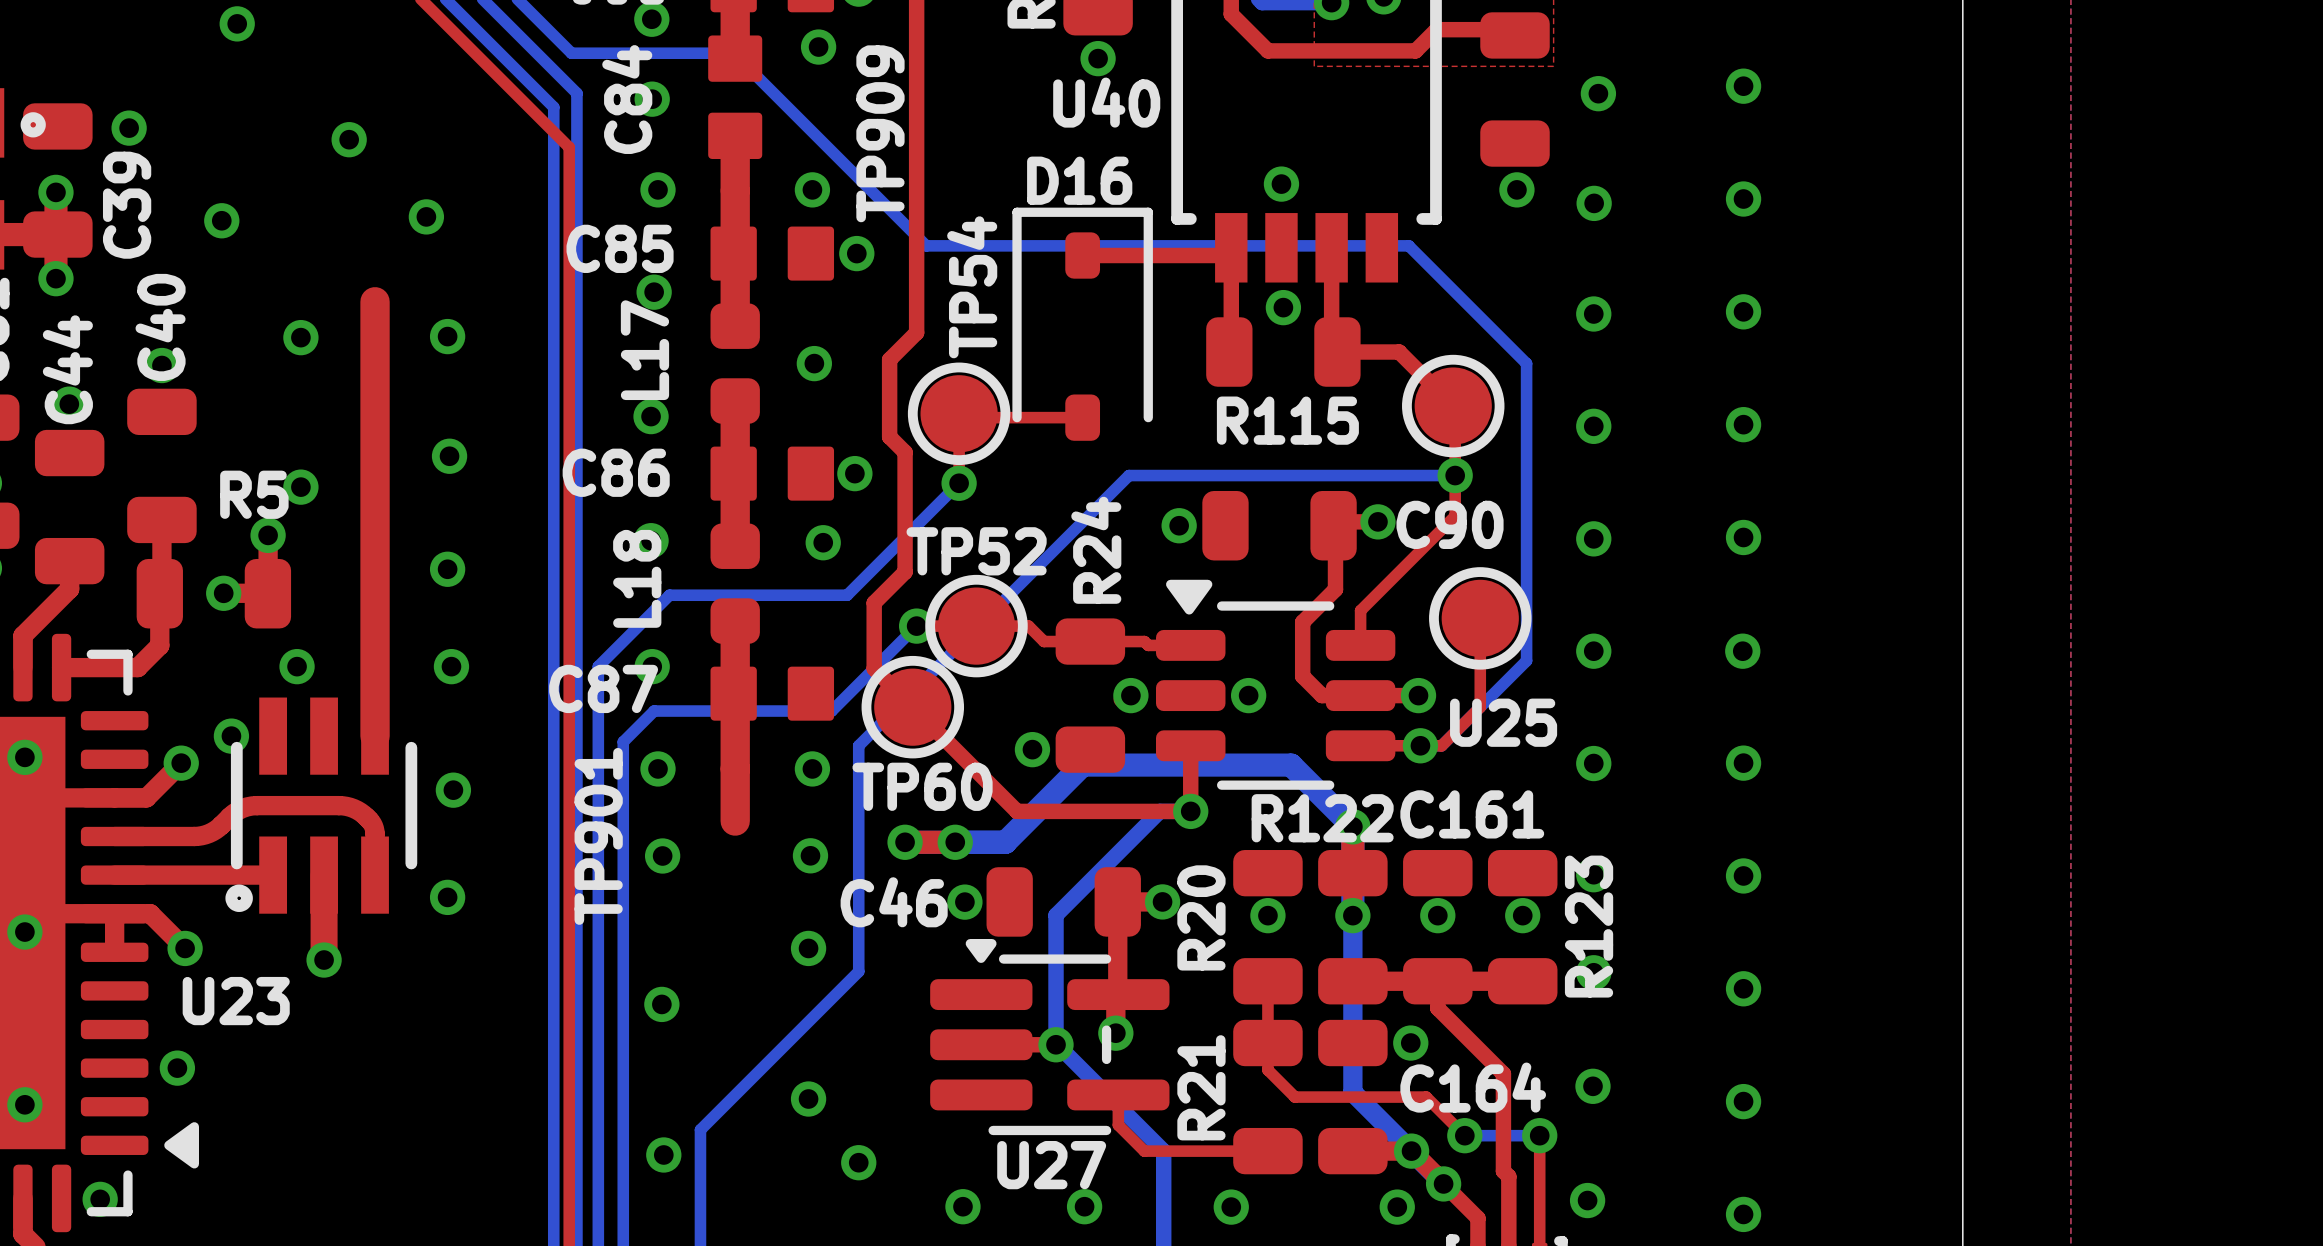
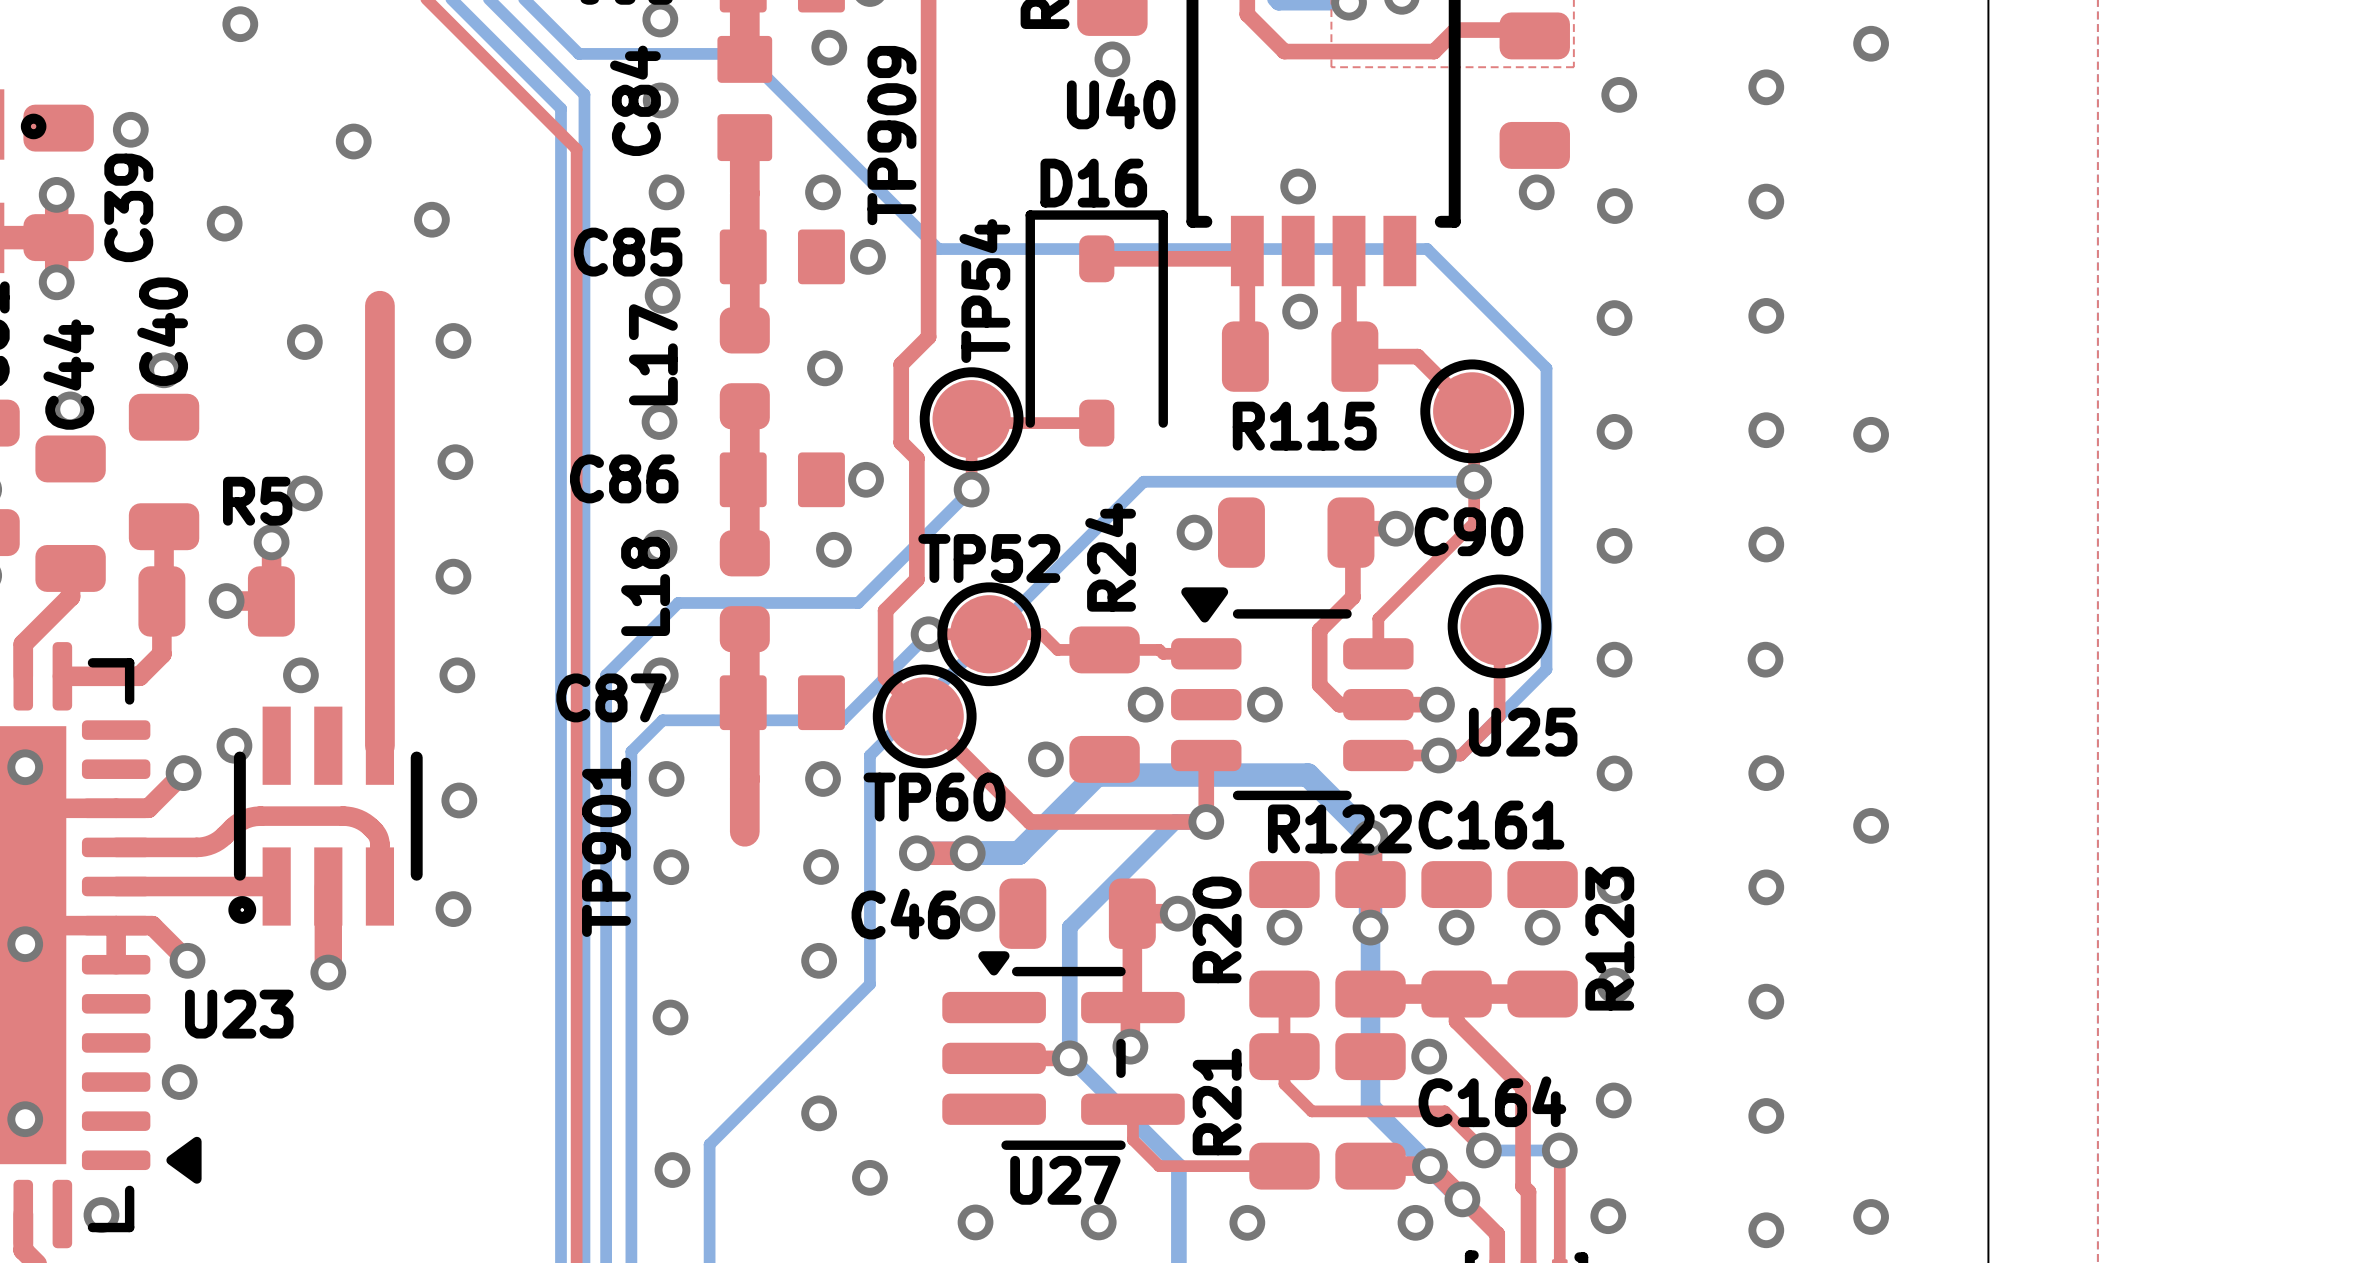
via: none -> (1871, 43)
via: none -> (1871, 434)
via: none -> (1871, 825)
via: none -> (1871, 1216)

